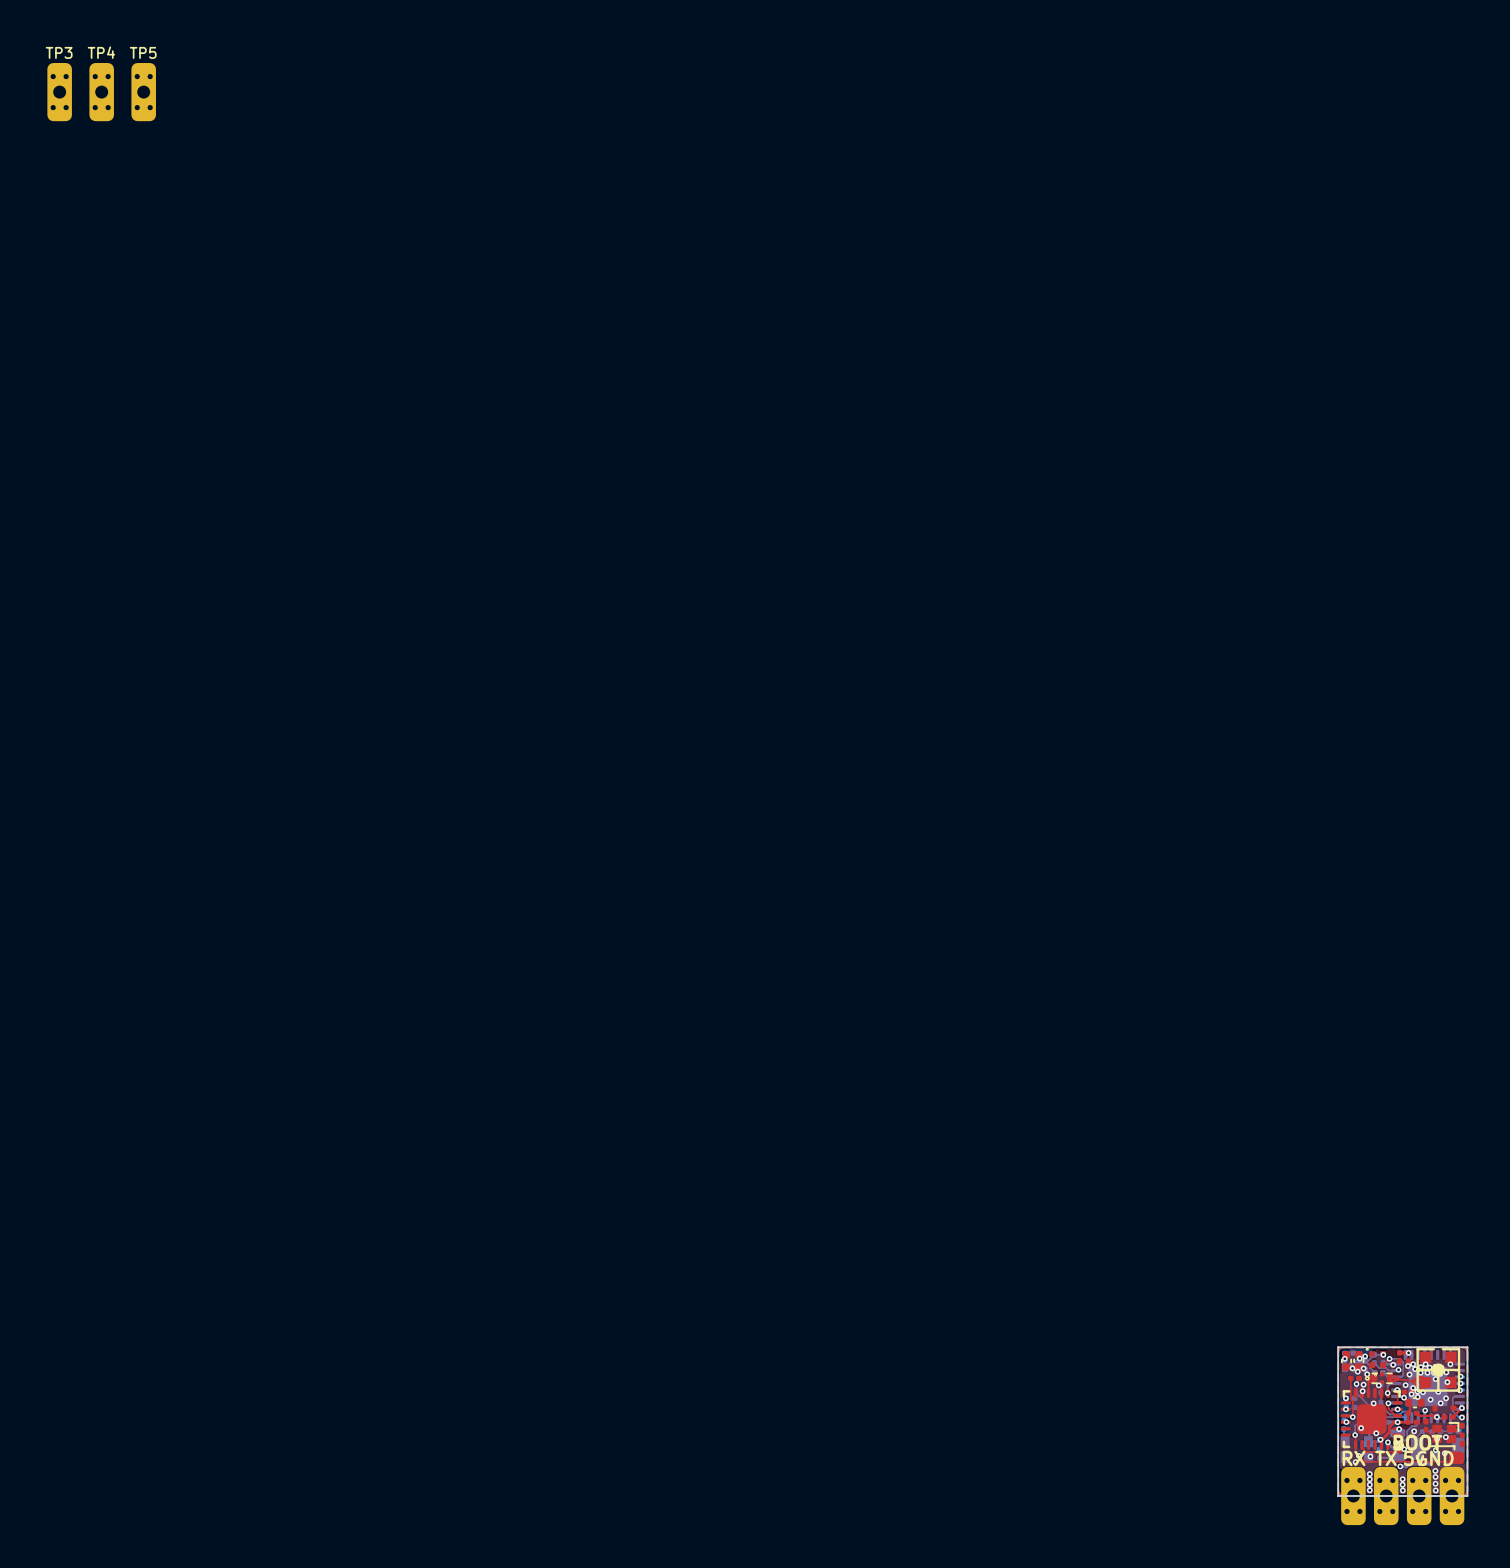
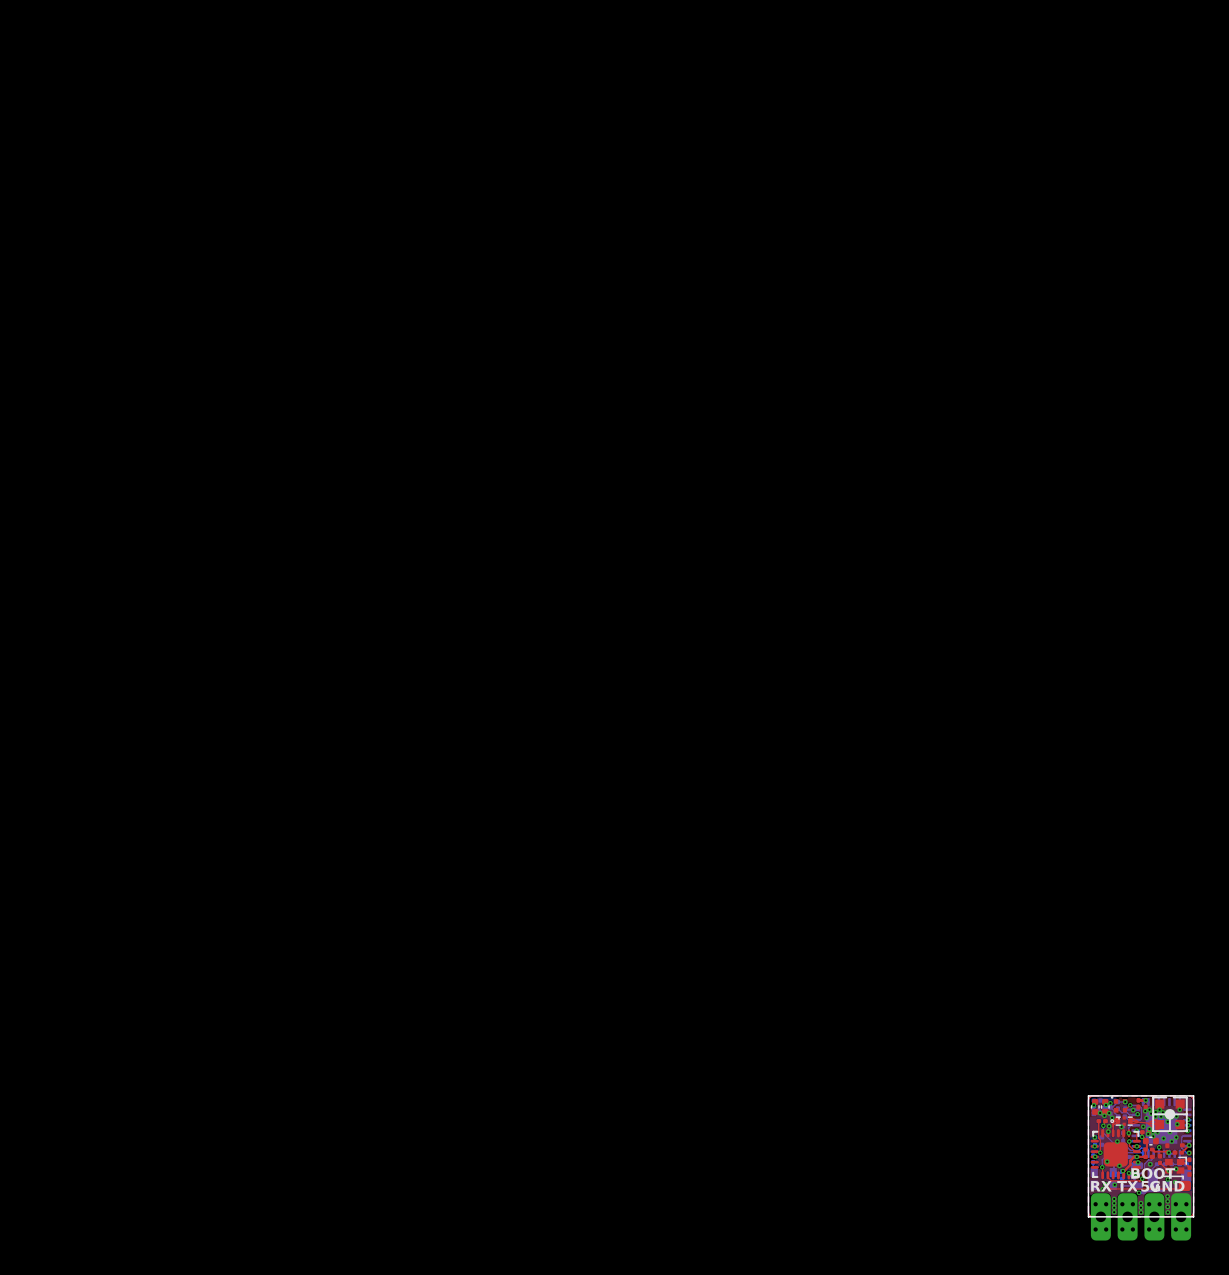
TP3: (59, 92) -> none
TP4: (101, 92) -> none
TP5: (143, 92) -> none

